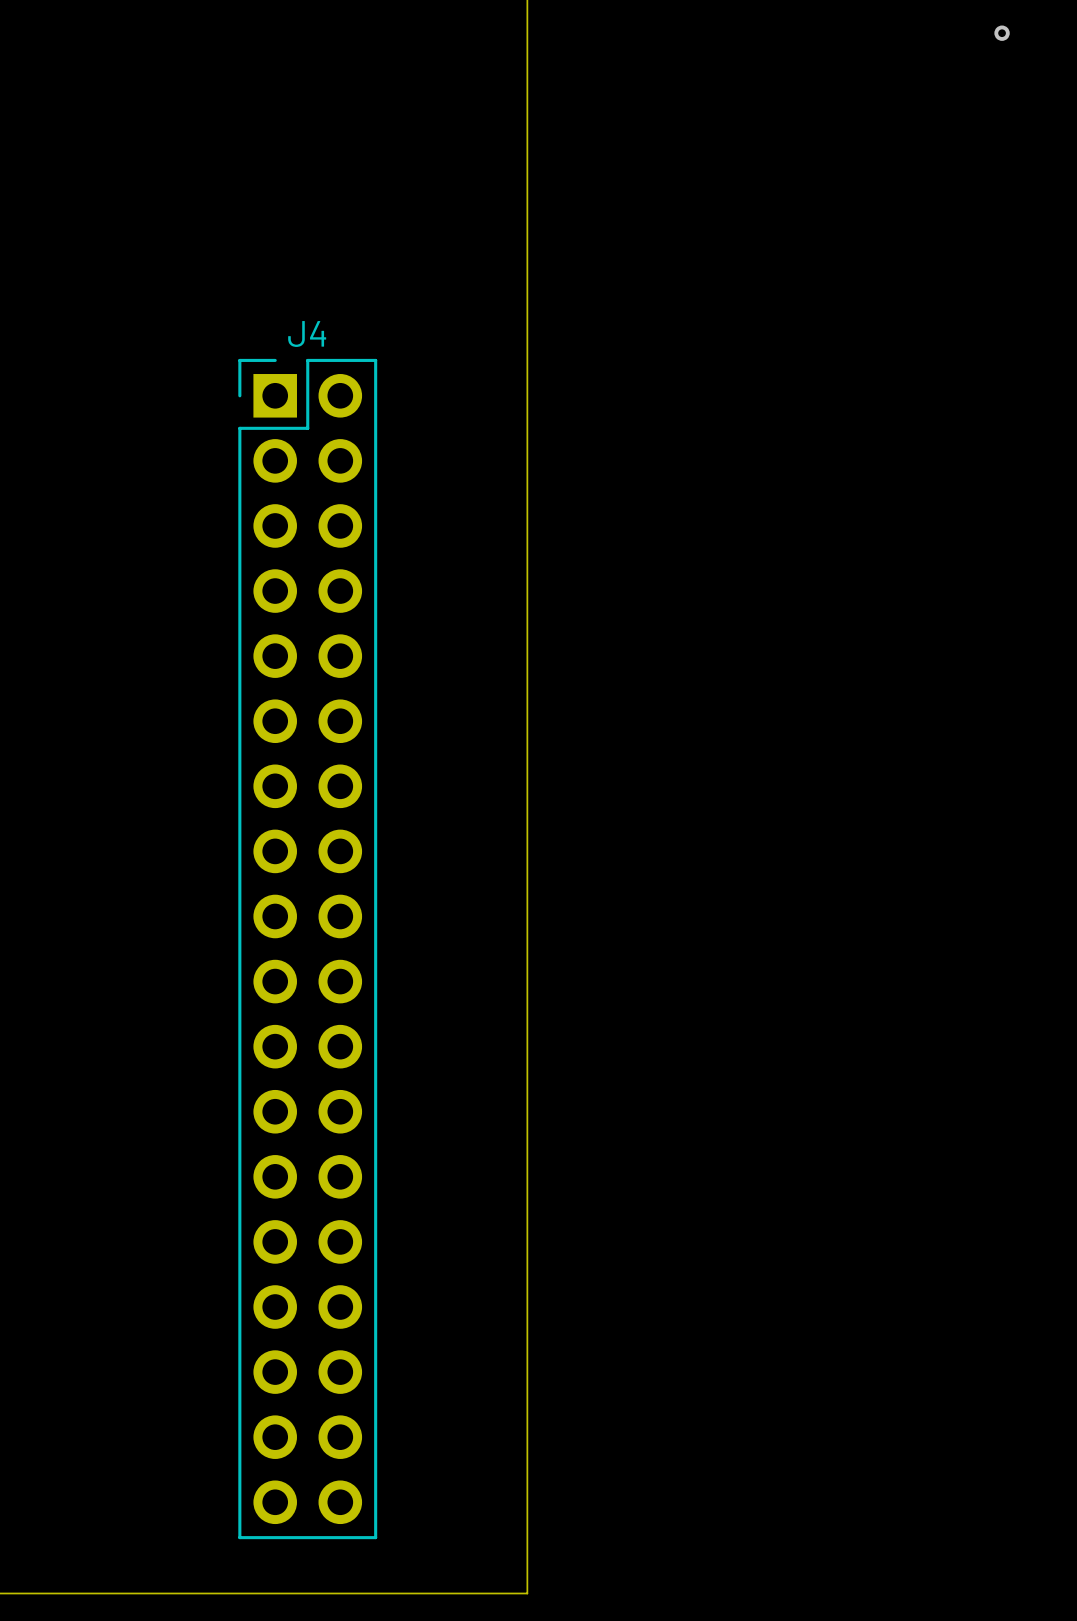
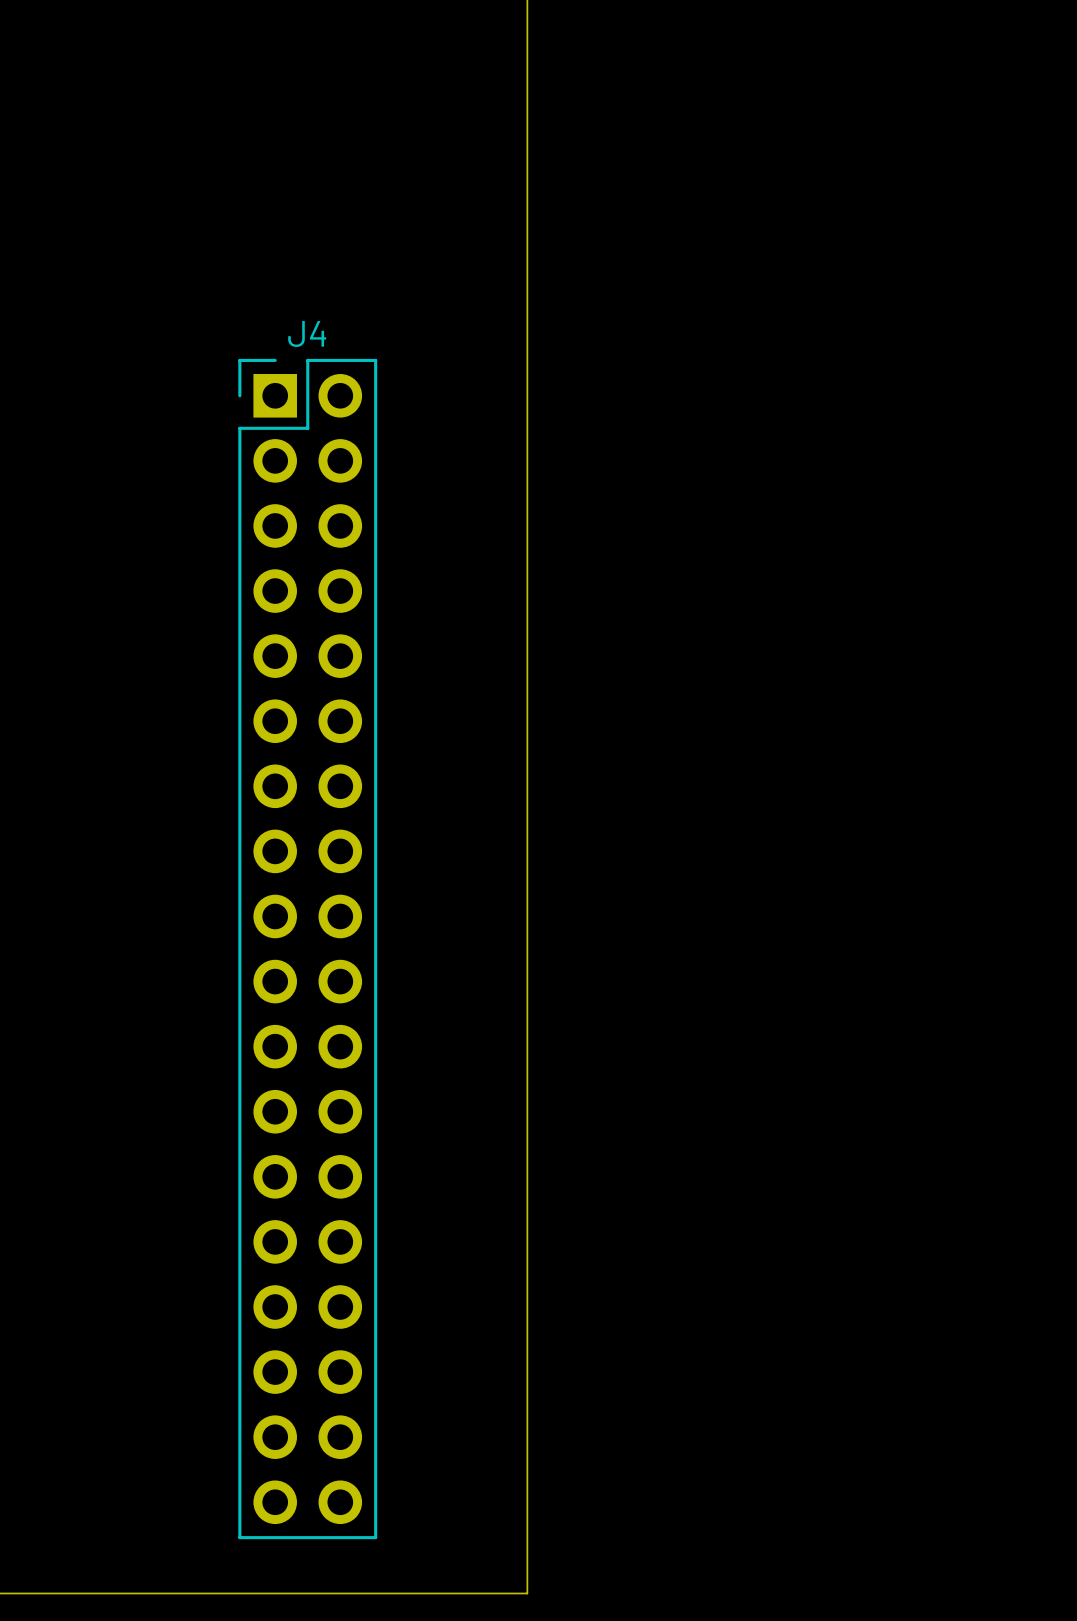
via: (1002, 33) -> none

